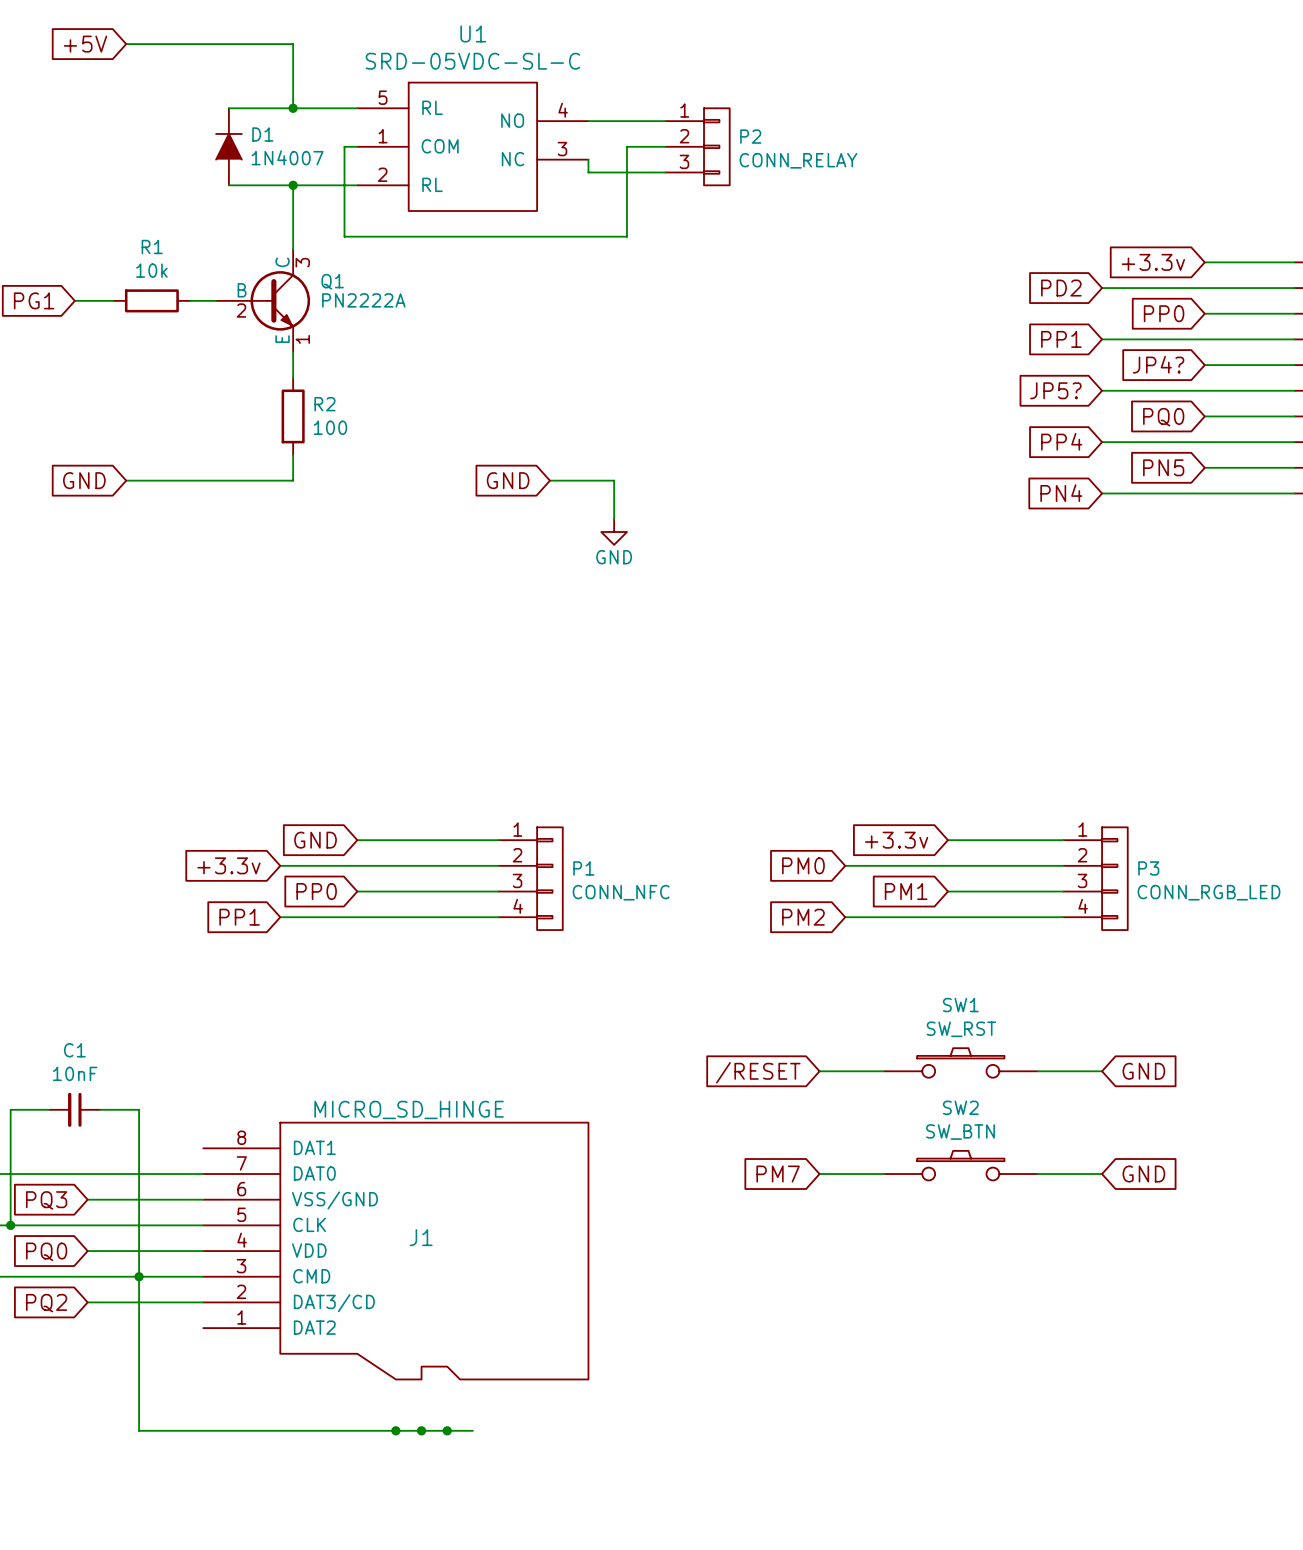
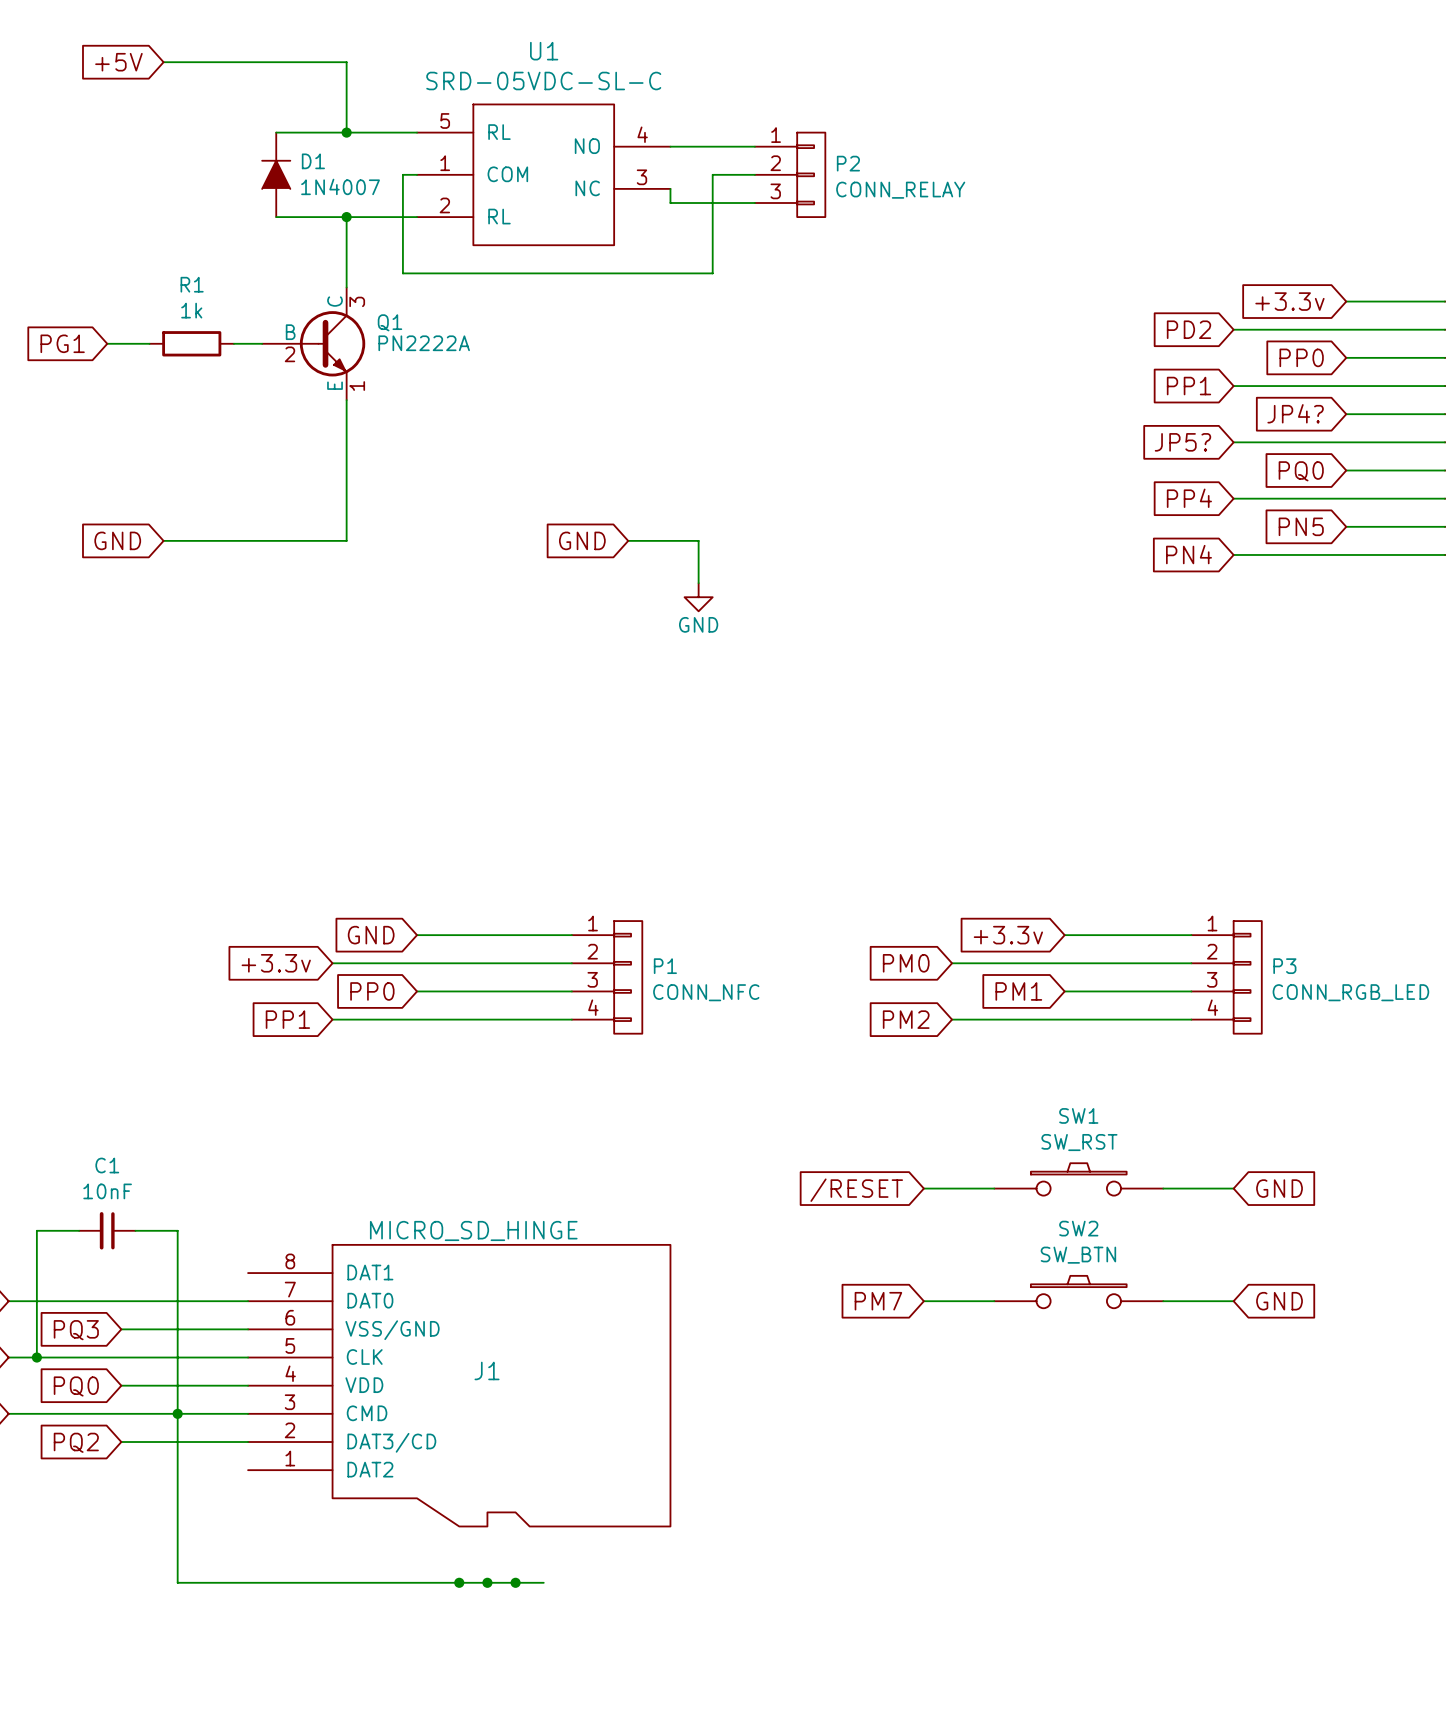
R1 value: 10k (151, 270) -> 1k (191, 310)
wire: none -> (346, 428) (346, 512)
R2: 100 (293, 416) -> none

